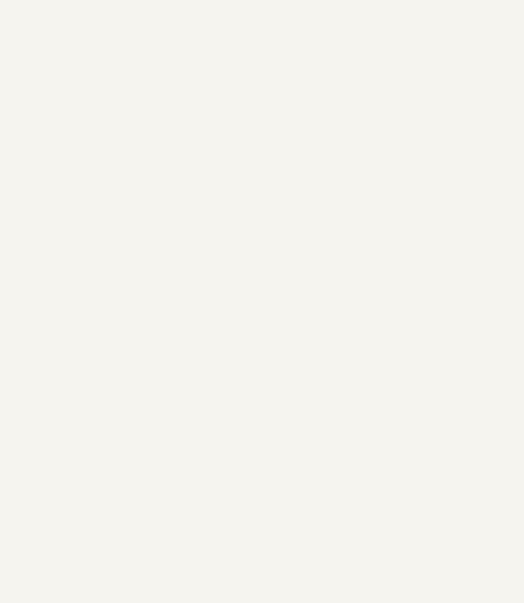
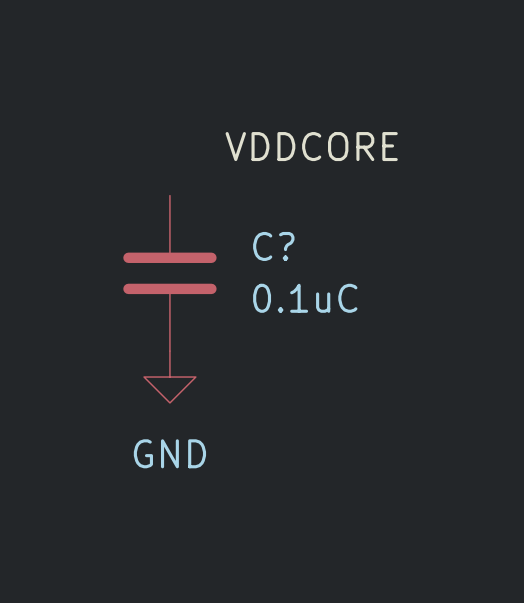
label: none -> VDDCORE (311, 146)
C?: none -> 0.1uC (169, 273)
power symbol: none -> GND (169, 377)

